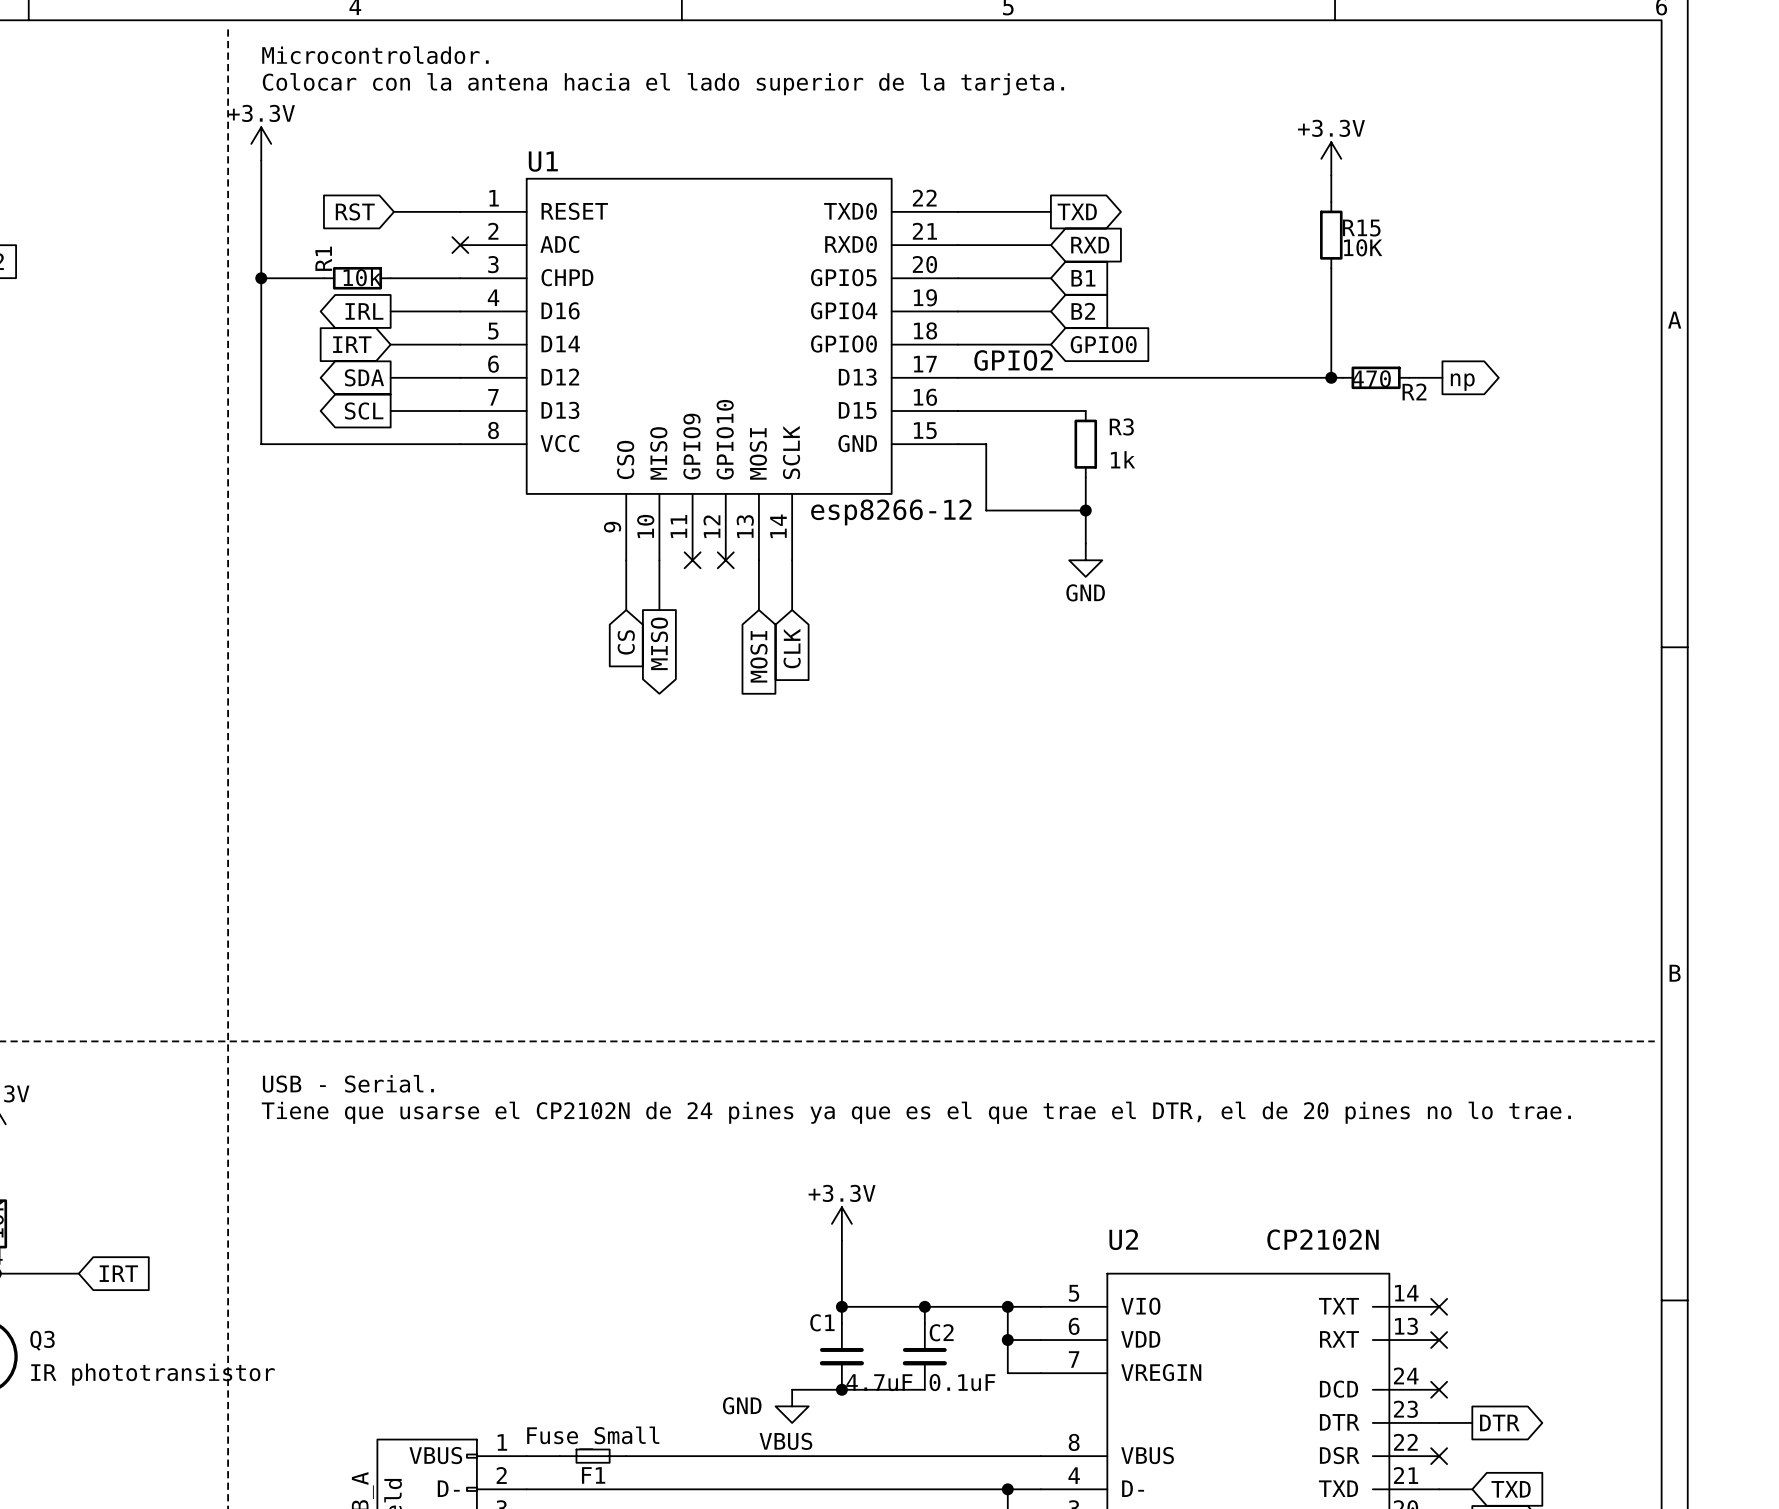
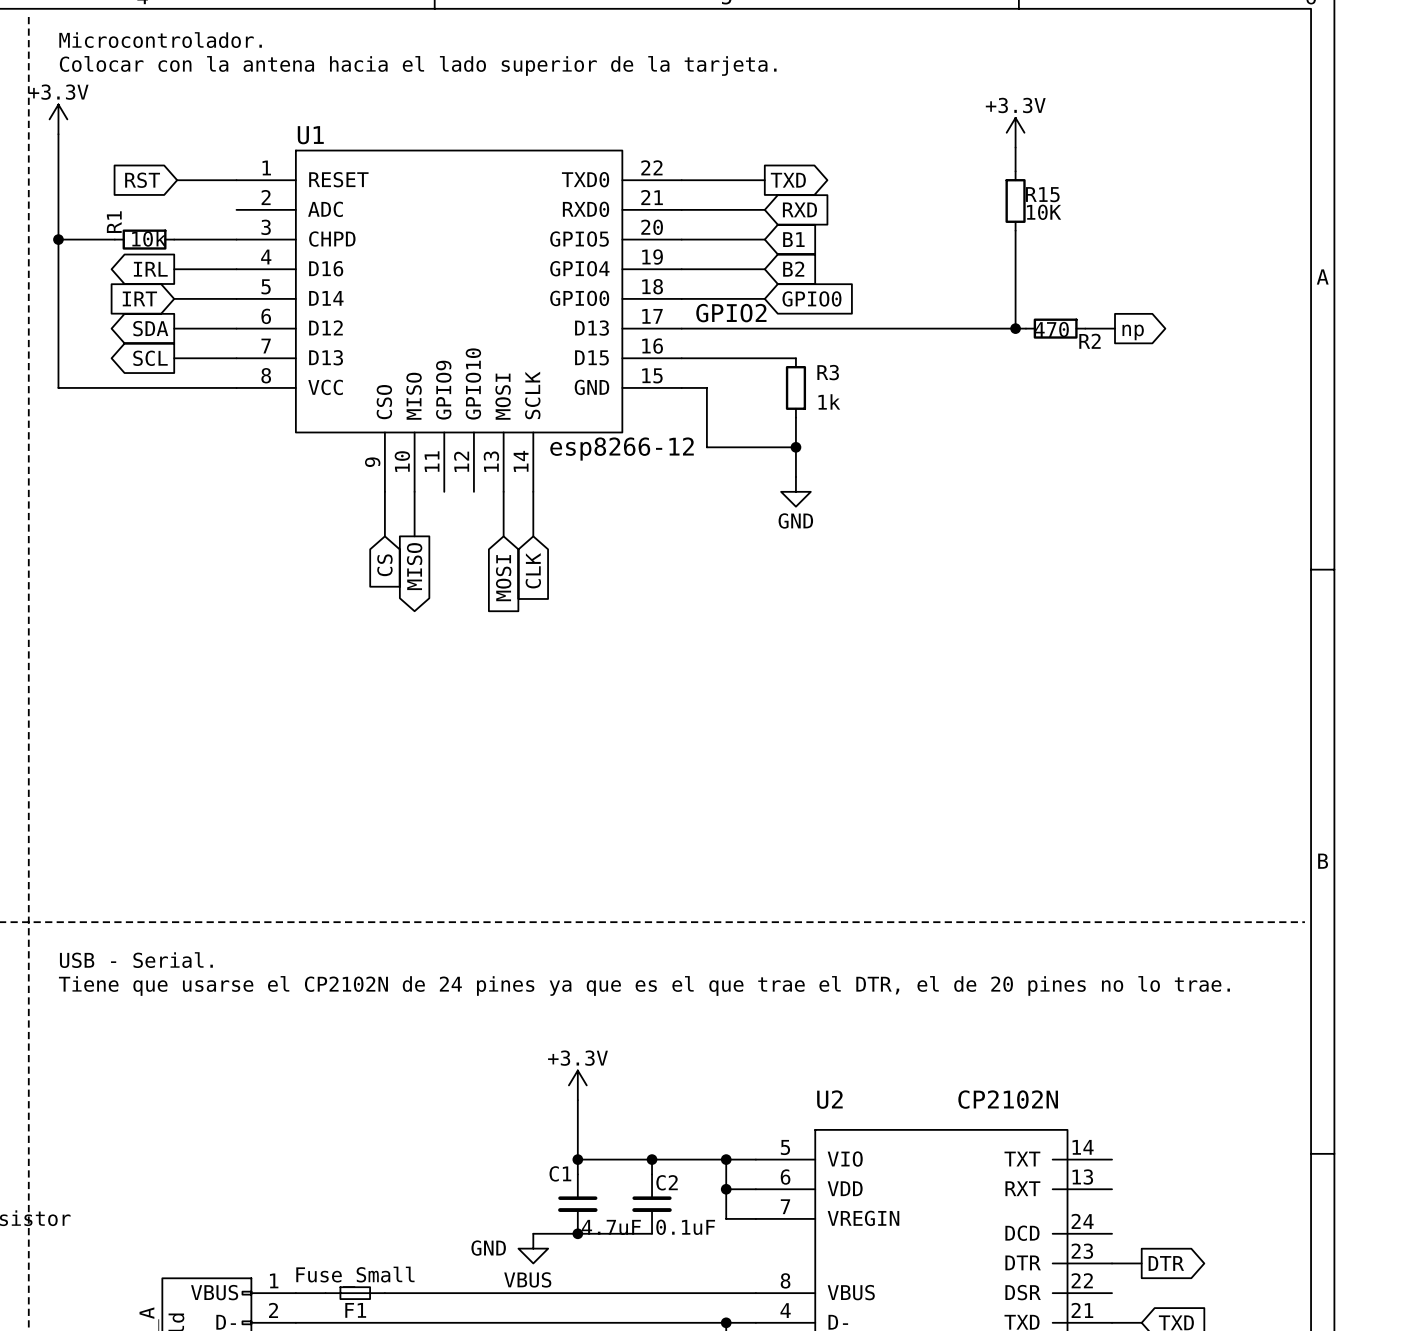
no-connect mark: (460, 245) -> none
no-connect mark: (692, 560) -> none
no-connect mark: (725, 560) -> none
no-connect mark: (1439, 1306) -> none
no-connect mark: (1439, 1340) -> none
no-connect mark: (1439, 1389) -> none
no-connect mark: (1439, 1456) -> none

